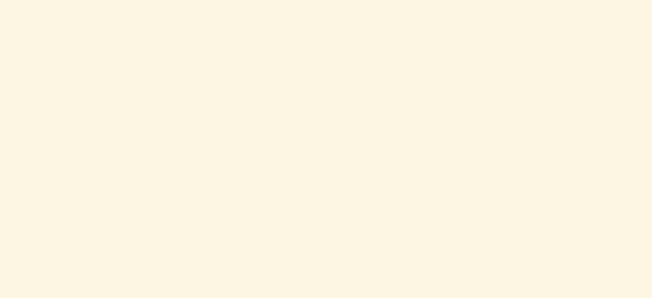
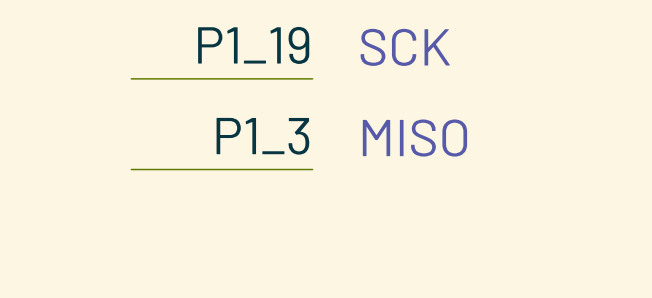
label: none -> P1_19 (253, 45)
text: none -> SCK (405, 47)
wire: none -> (131, 78) (312, 78)
label: none -> P1_3 (262, 136)
text: none -> MISO (414, 138)
wire: none -> (131, 169) (312, 169)

